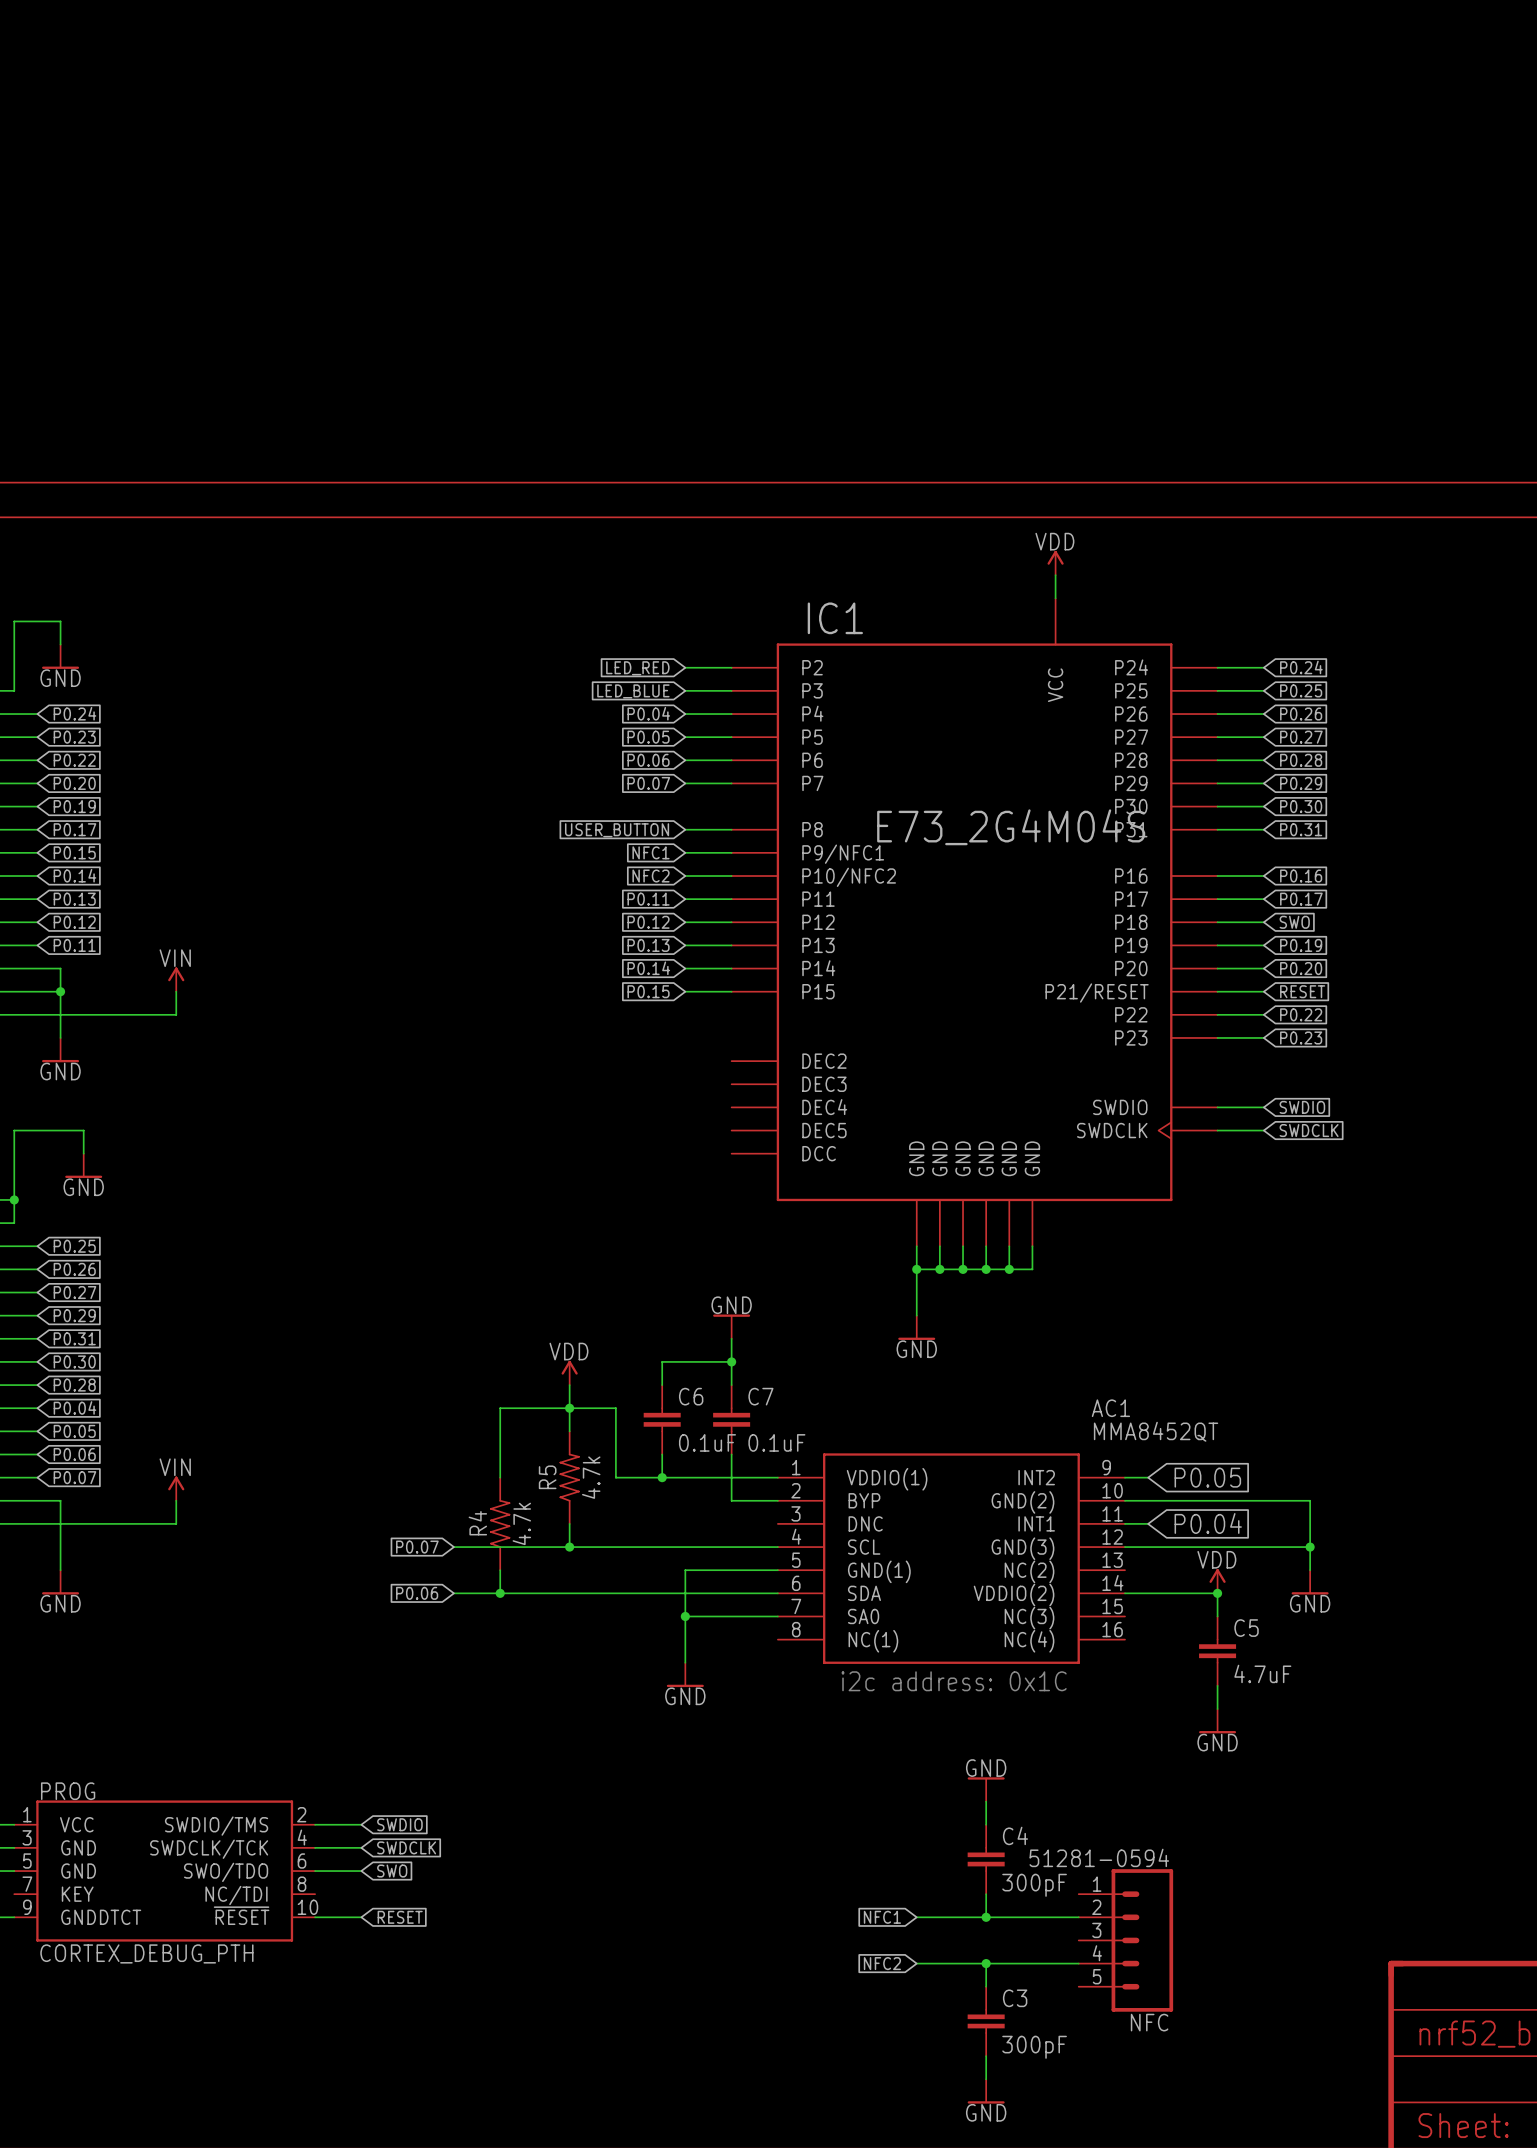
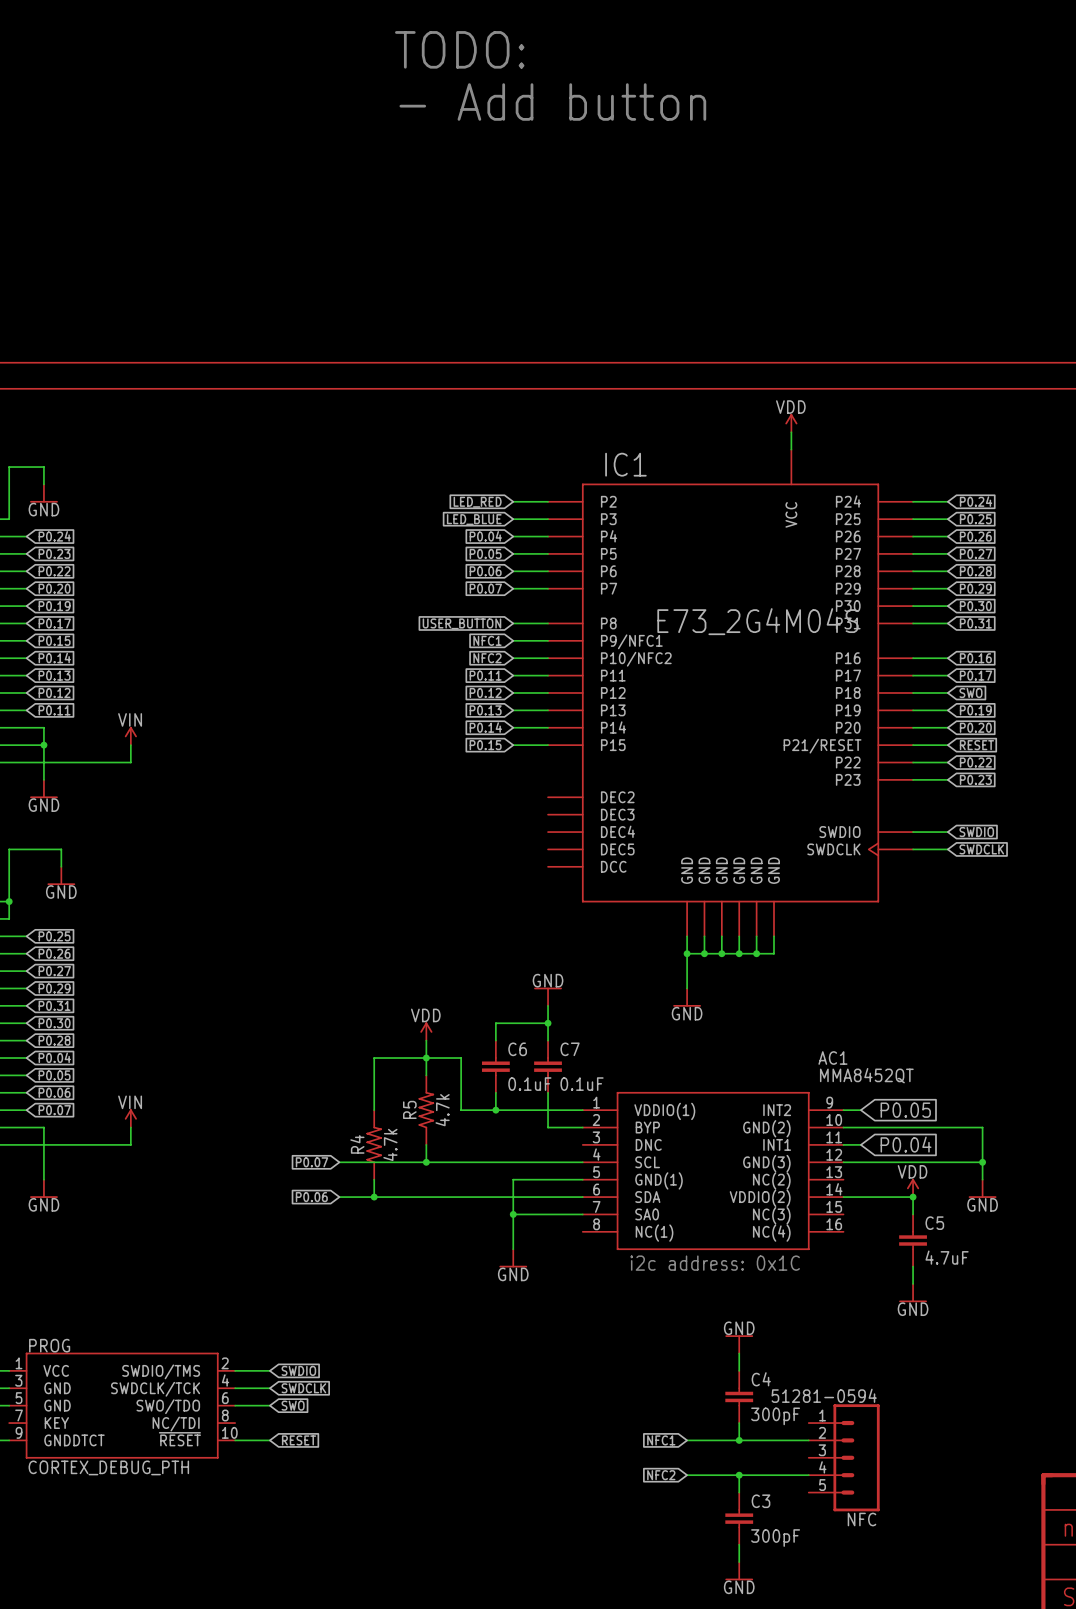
text: none -> TODO: (459, 49)
text: none -> - Add button (552, 102)

